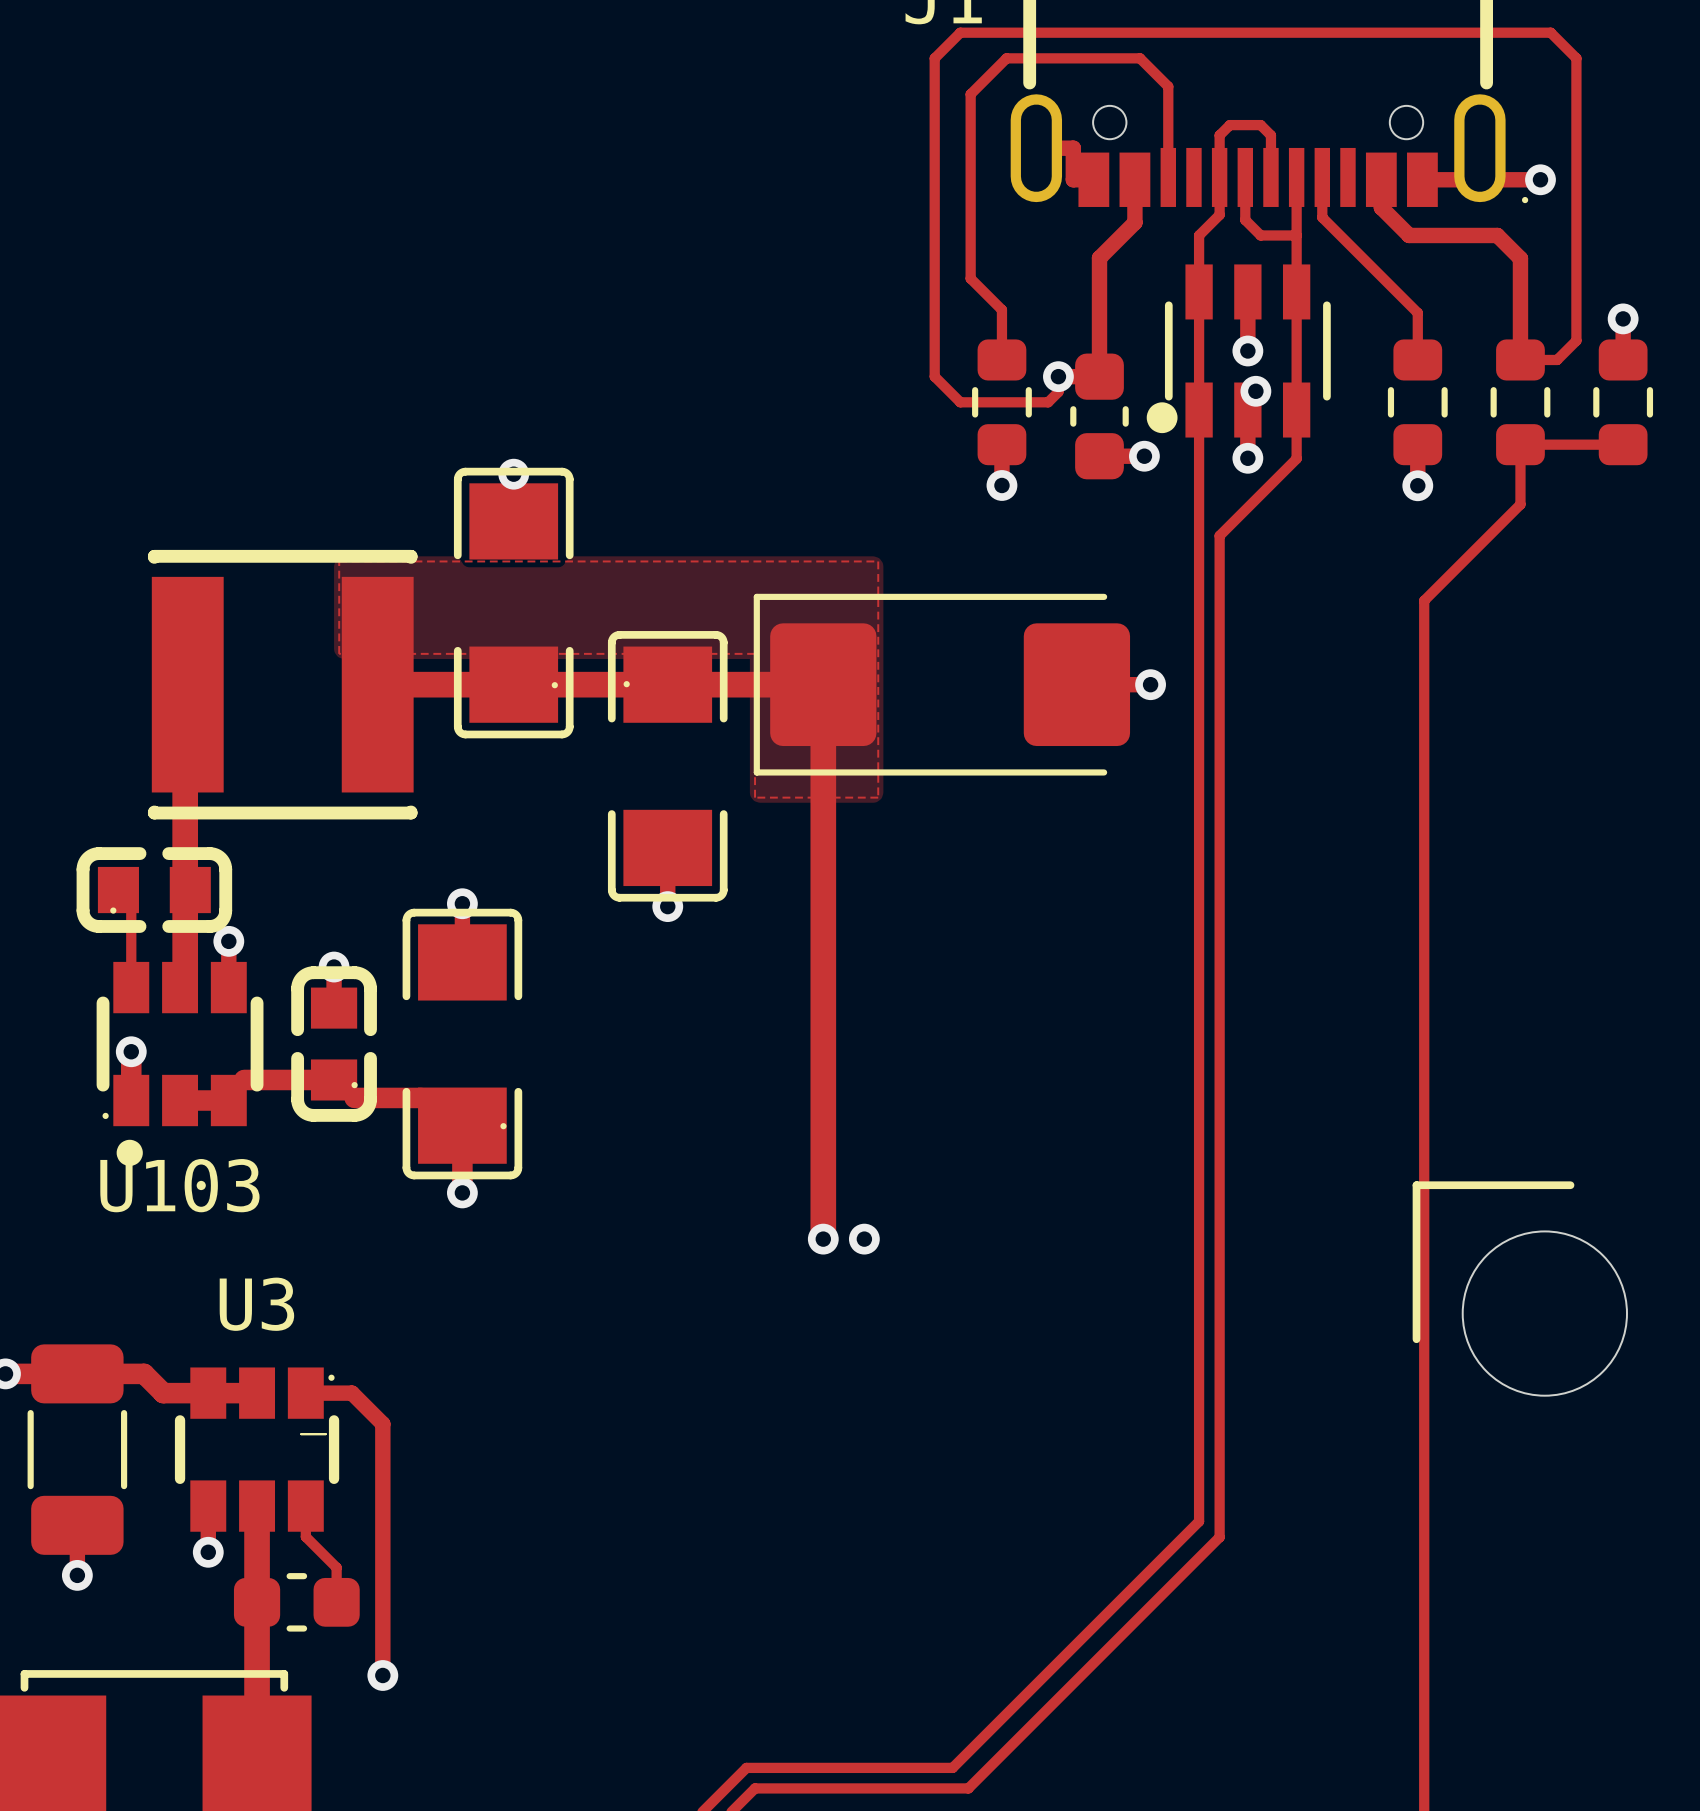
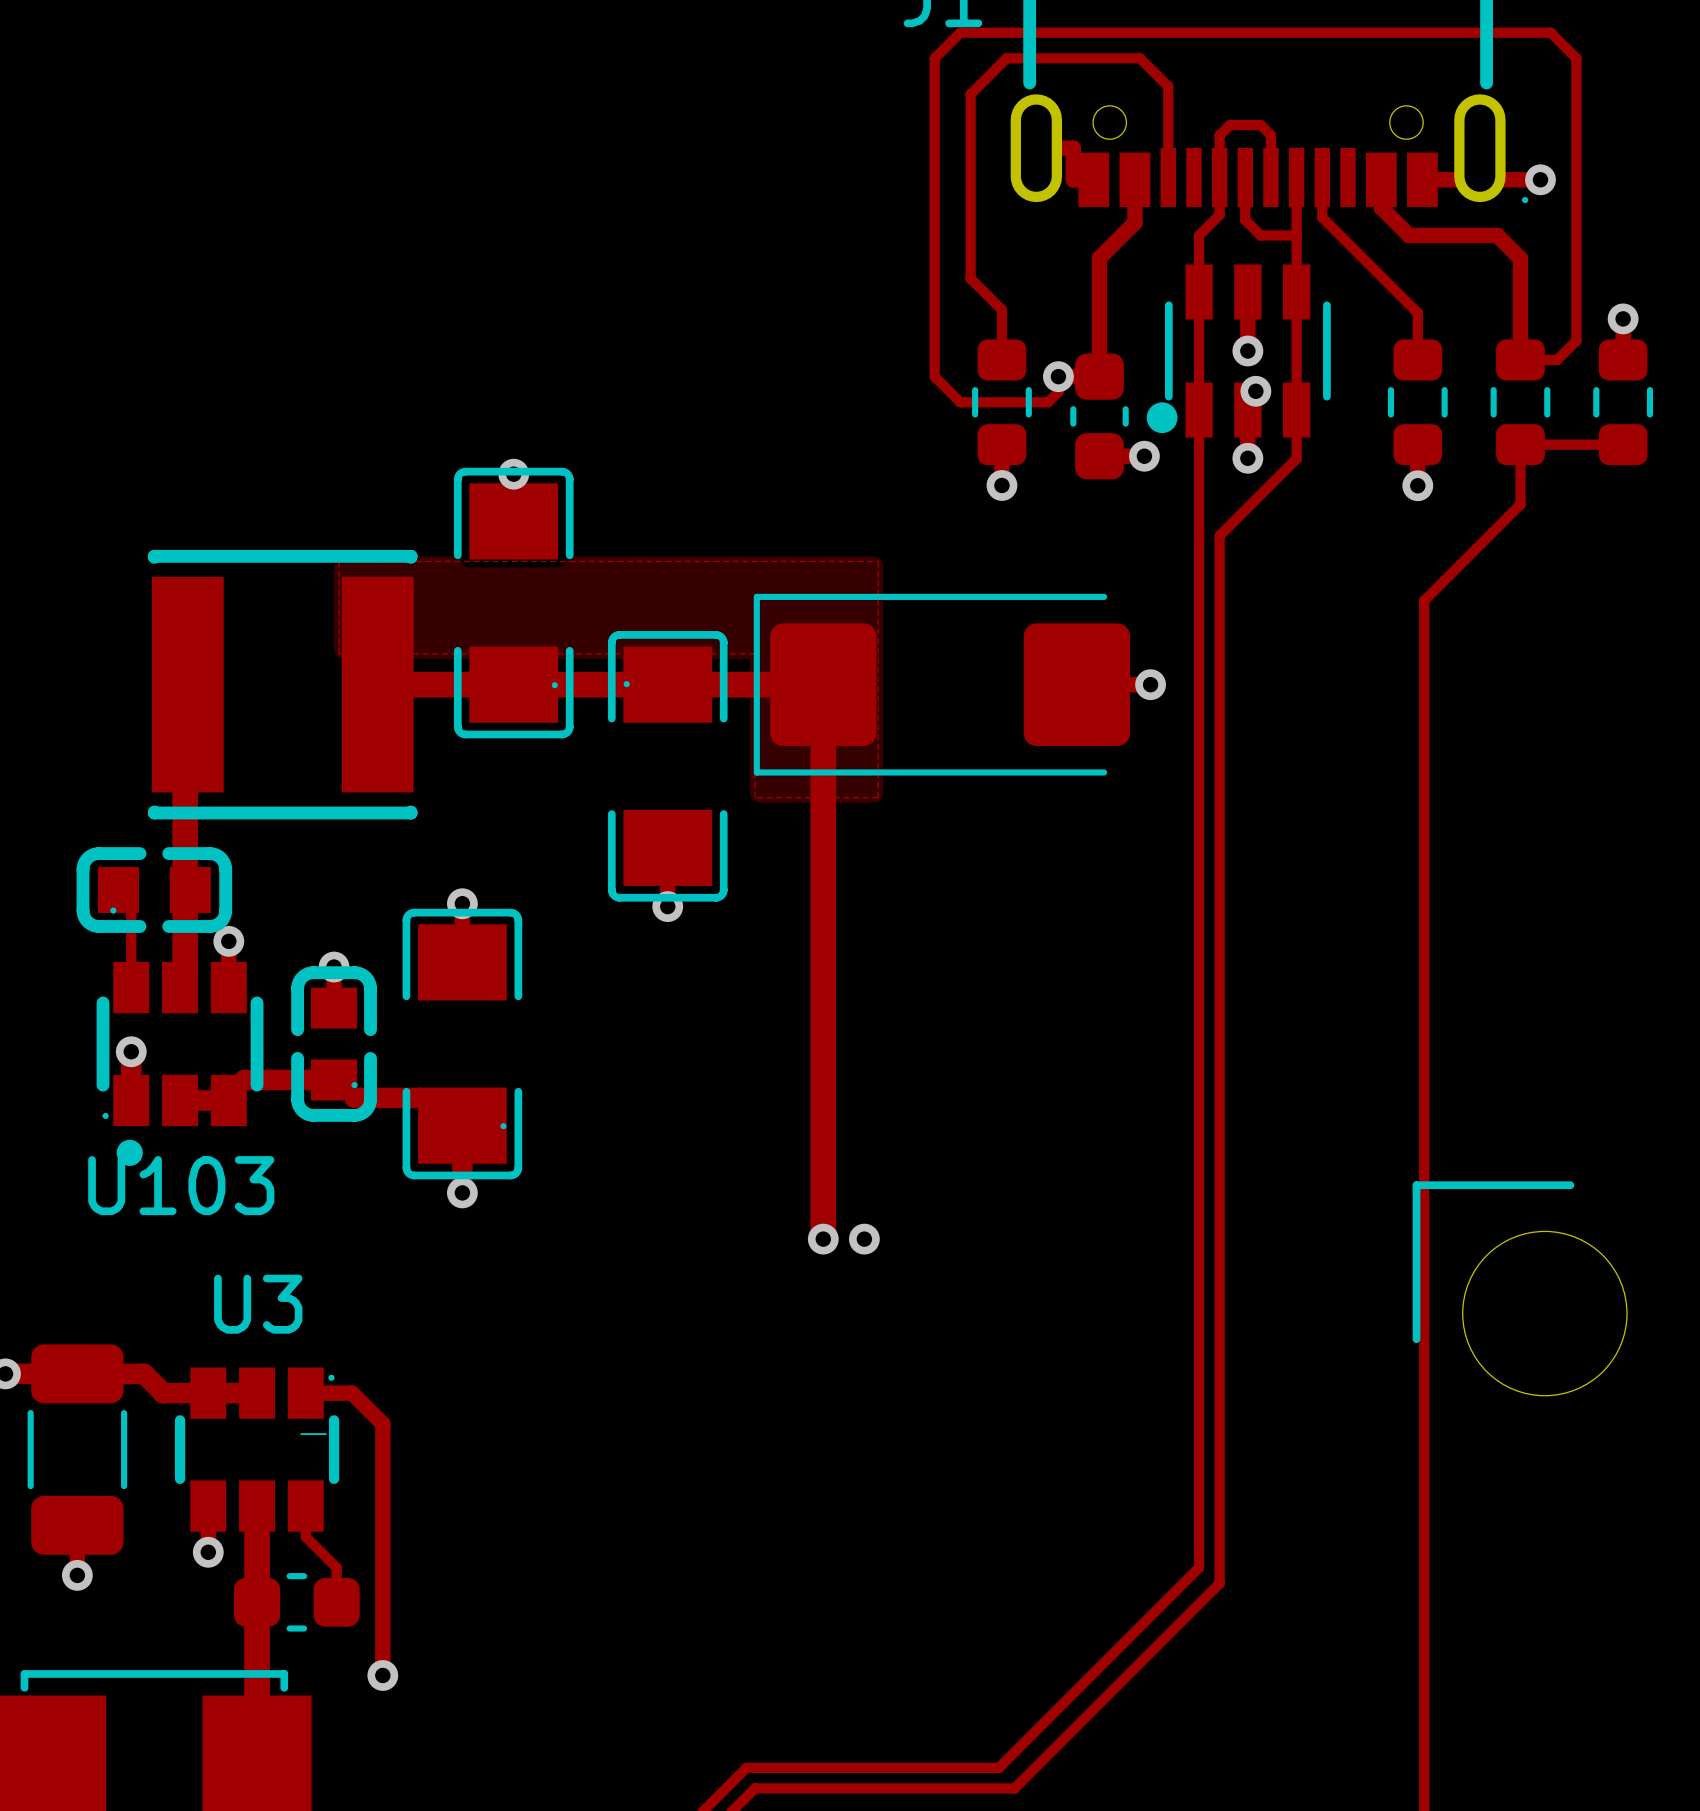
track: (1199, 1521) (952, 1767) -> (1199, 1521) (1199, 1567) (998, 1767) (952, 1767)
track: (1219, 1537) (968, 1788) -> (1219, 1537) (1219, 1583) (1014, 1788) (968, 1788)

